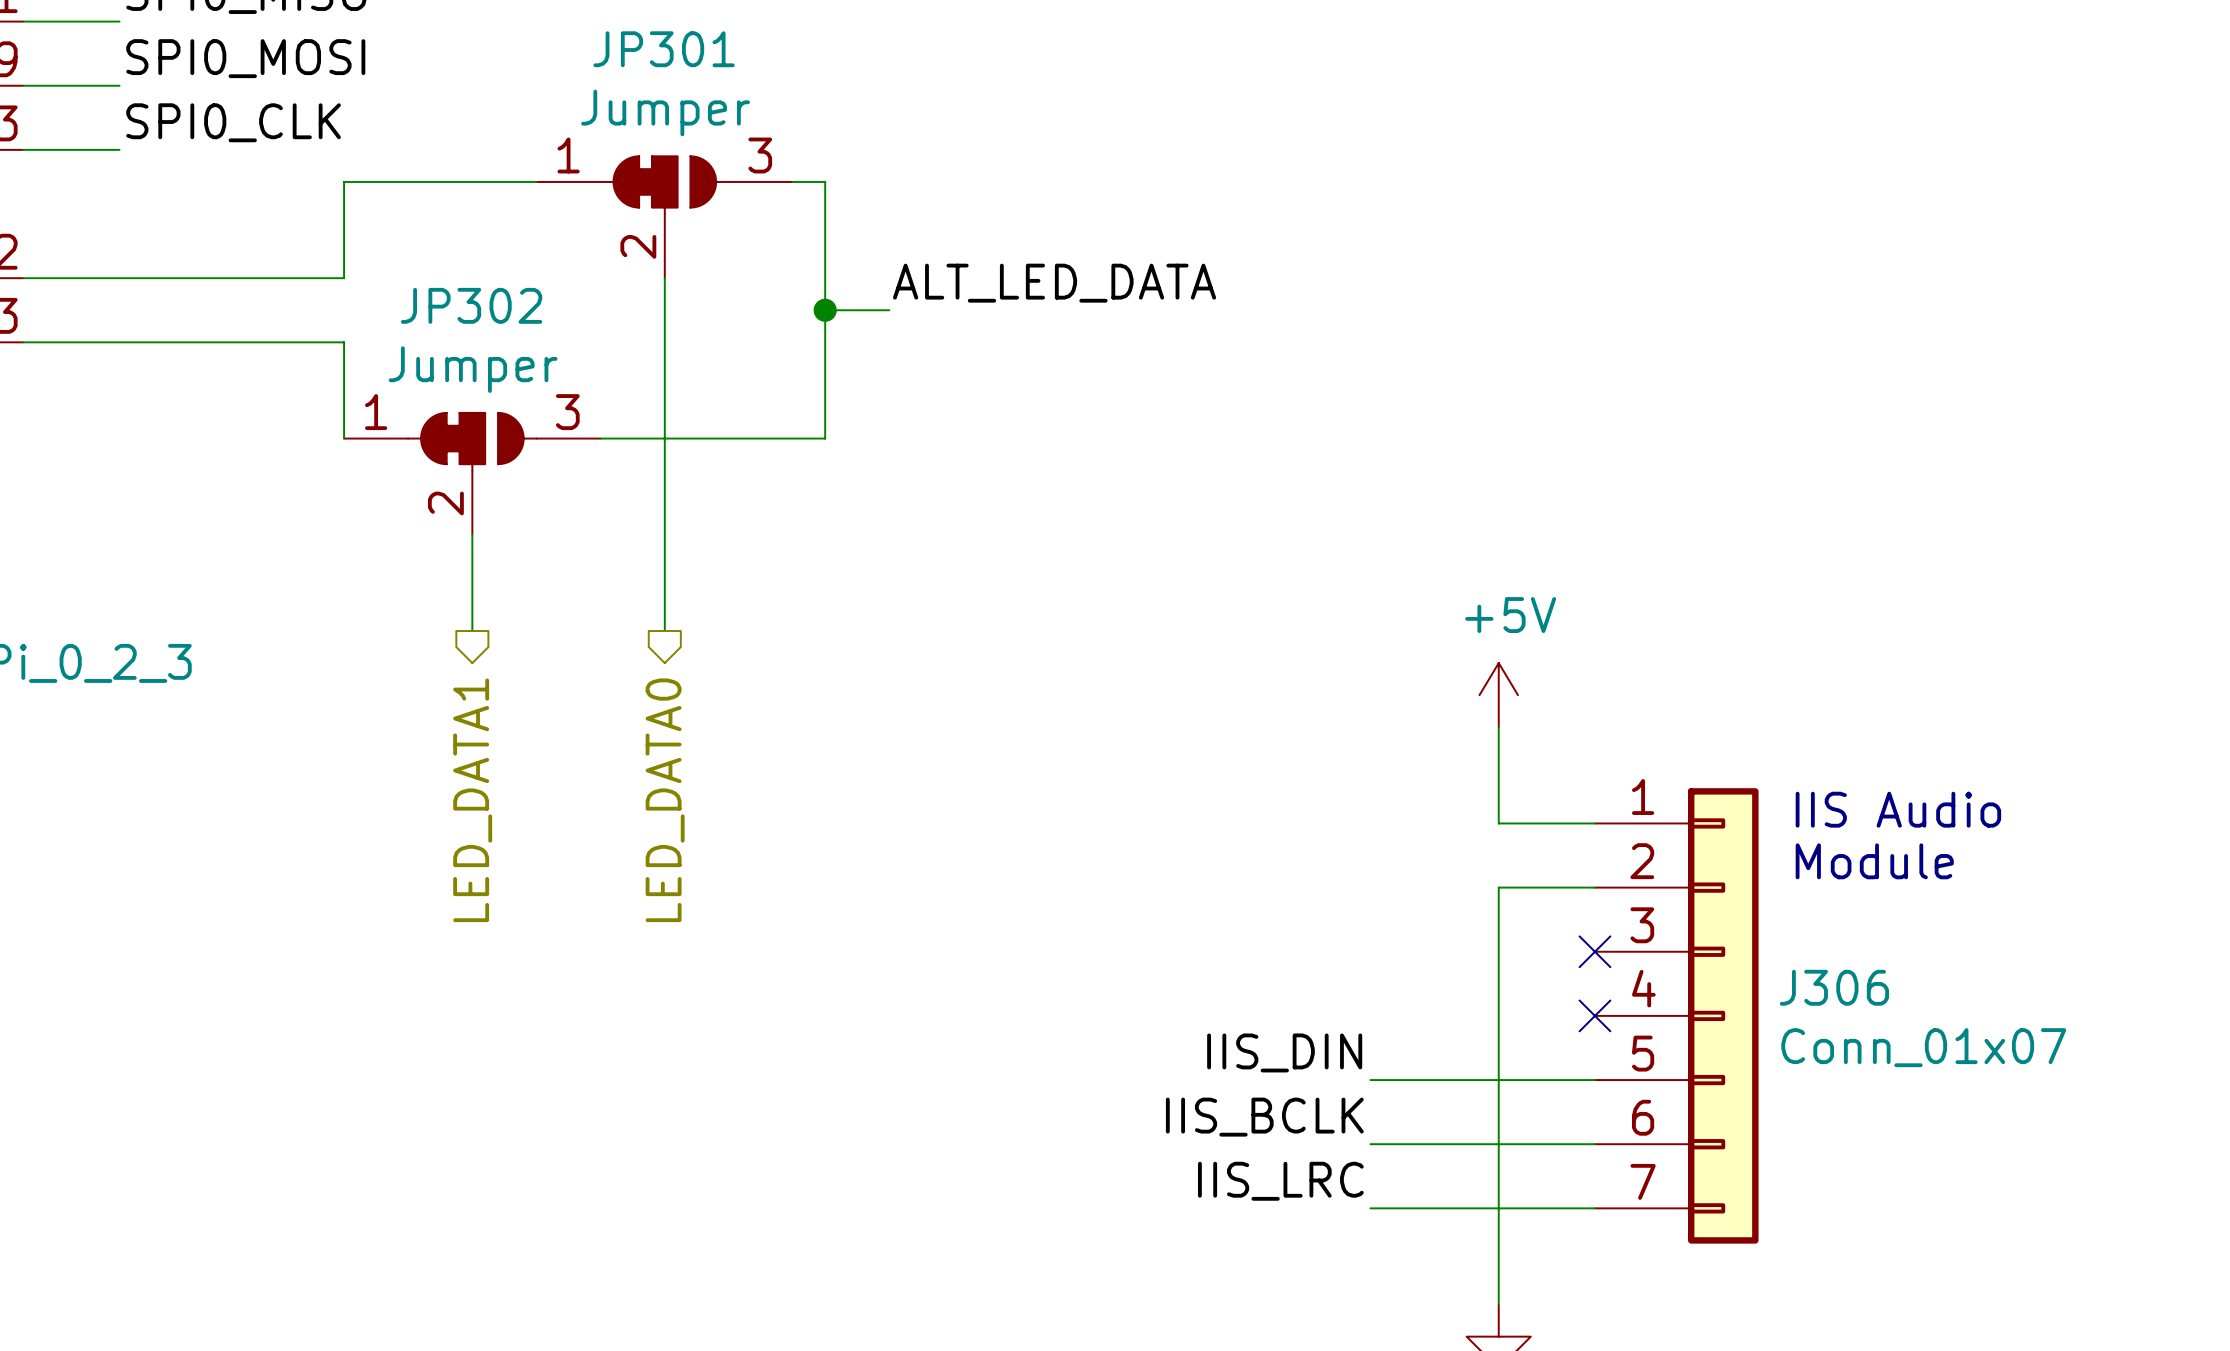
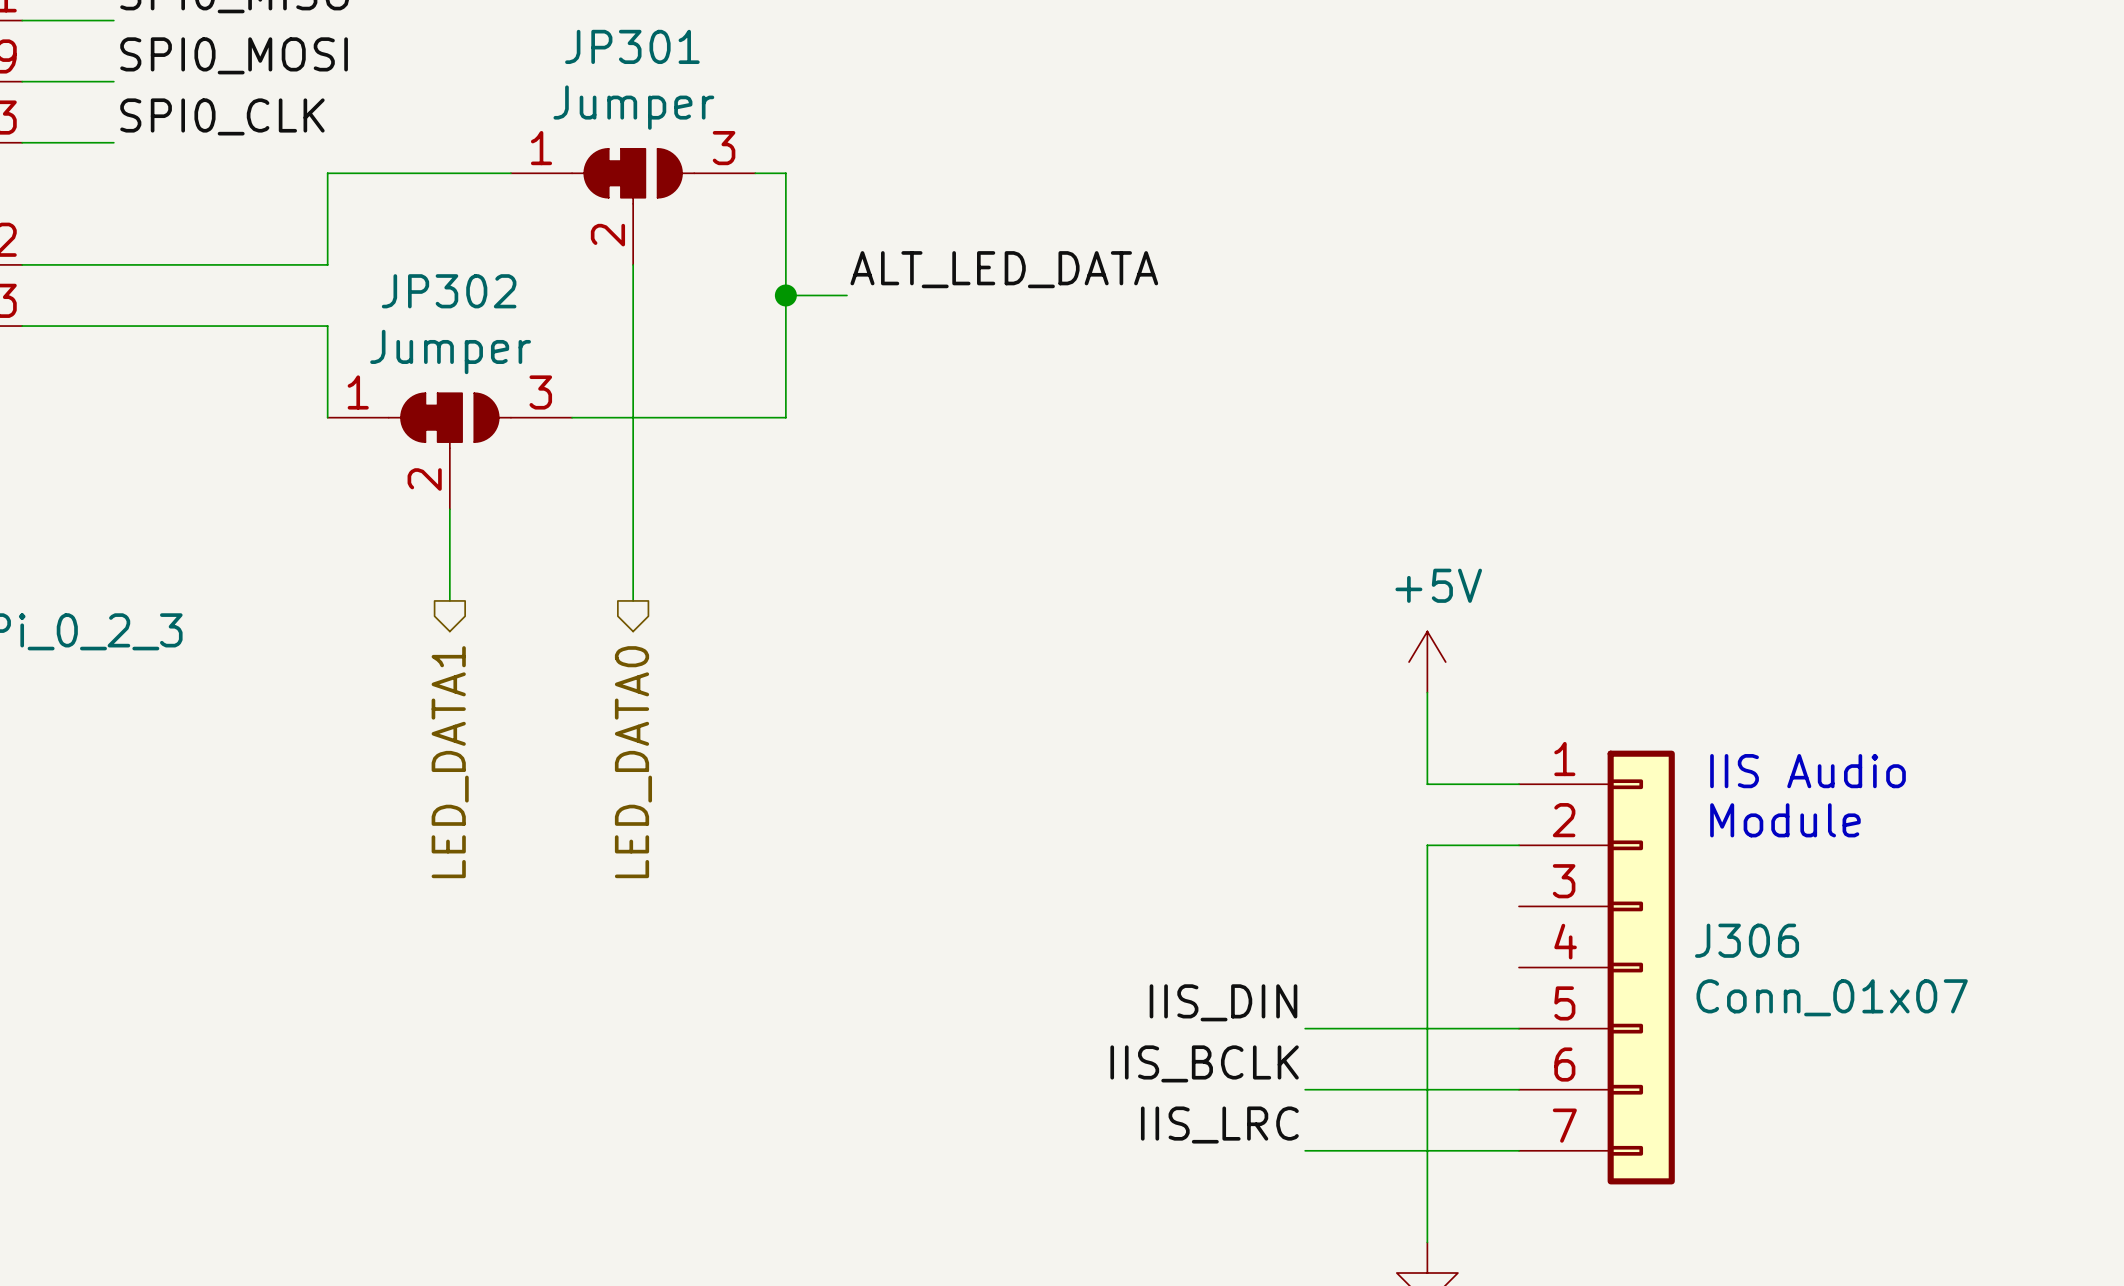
no-connect mark: (1594, 951) -> none
no-connect mark: (1594, 1015) -> none

